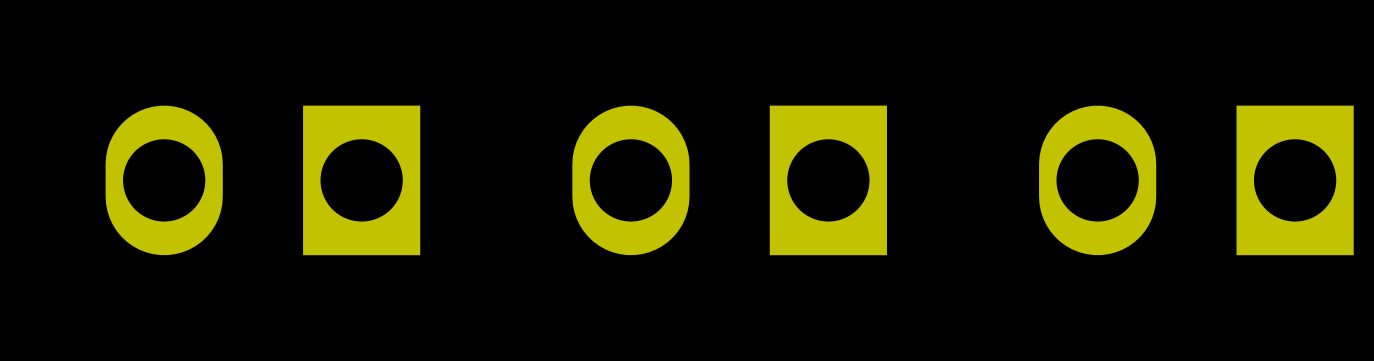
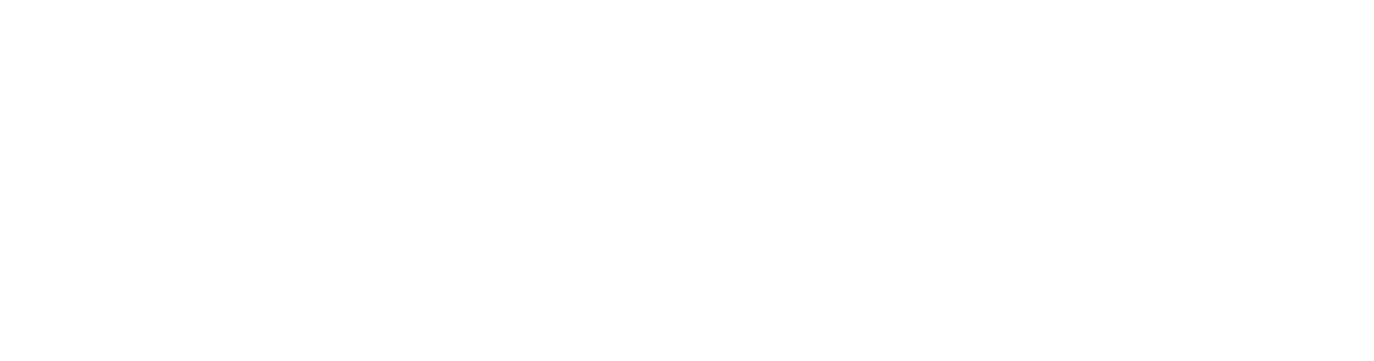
part: (262, 180) -> none
part: (729, 180) -> none
part: (1196, 180) -> none

